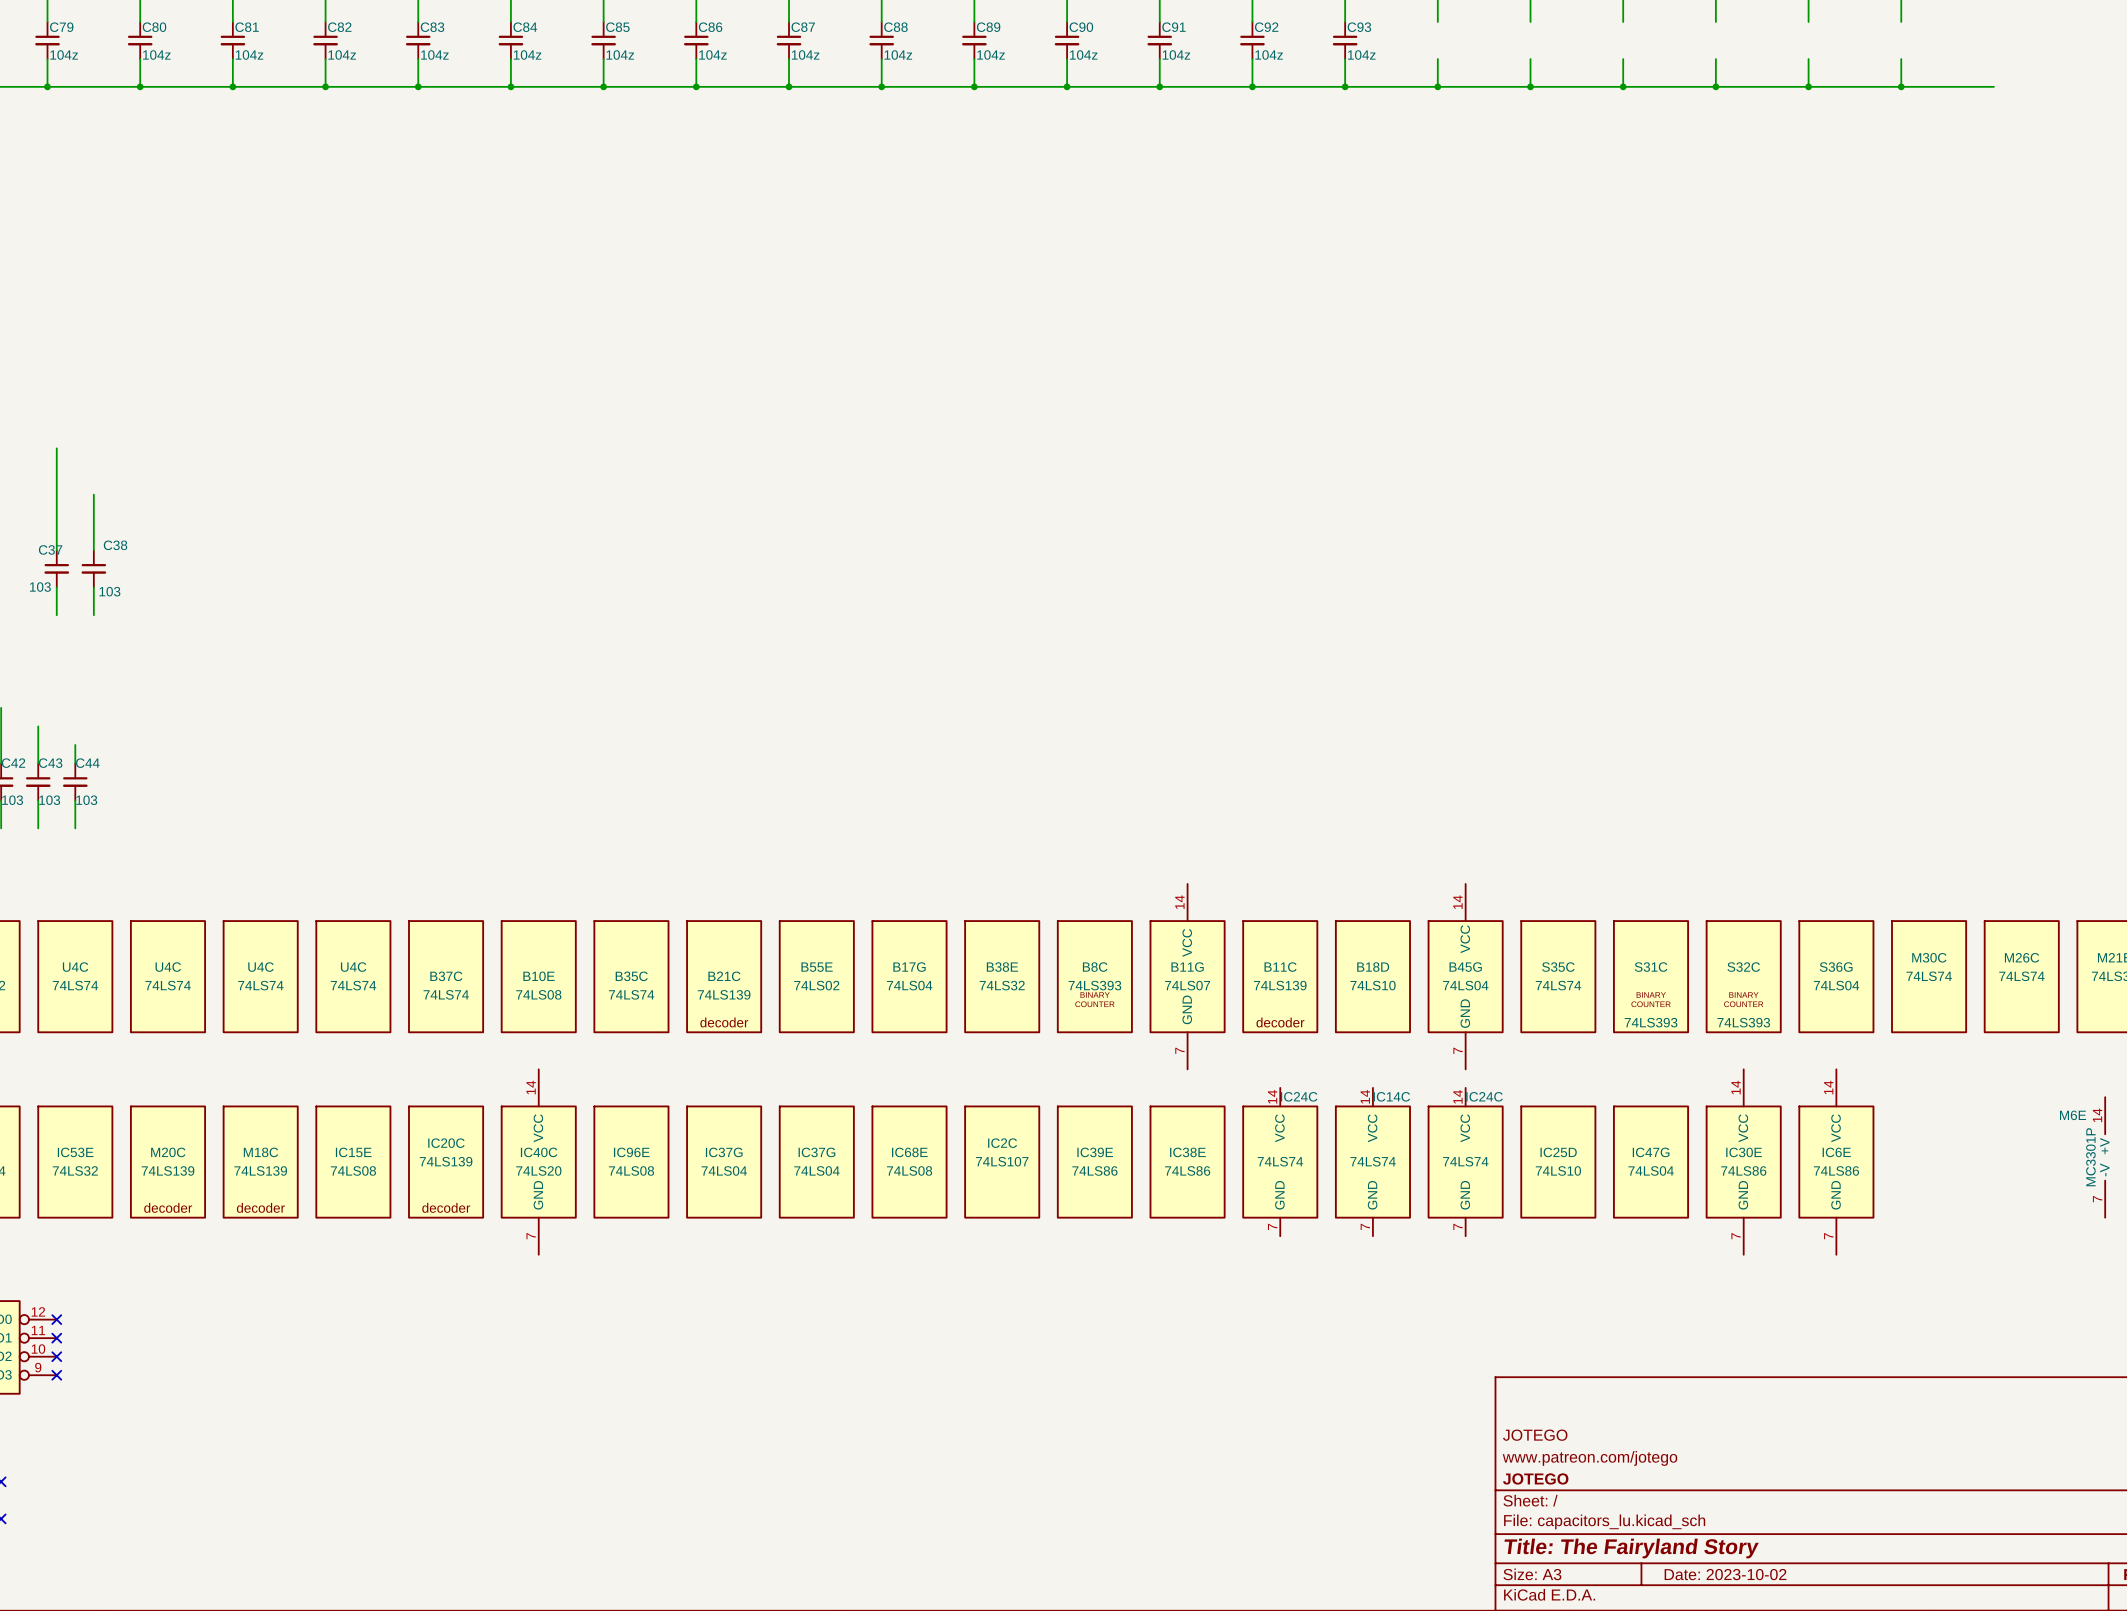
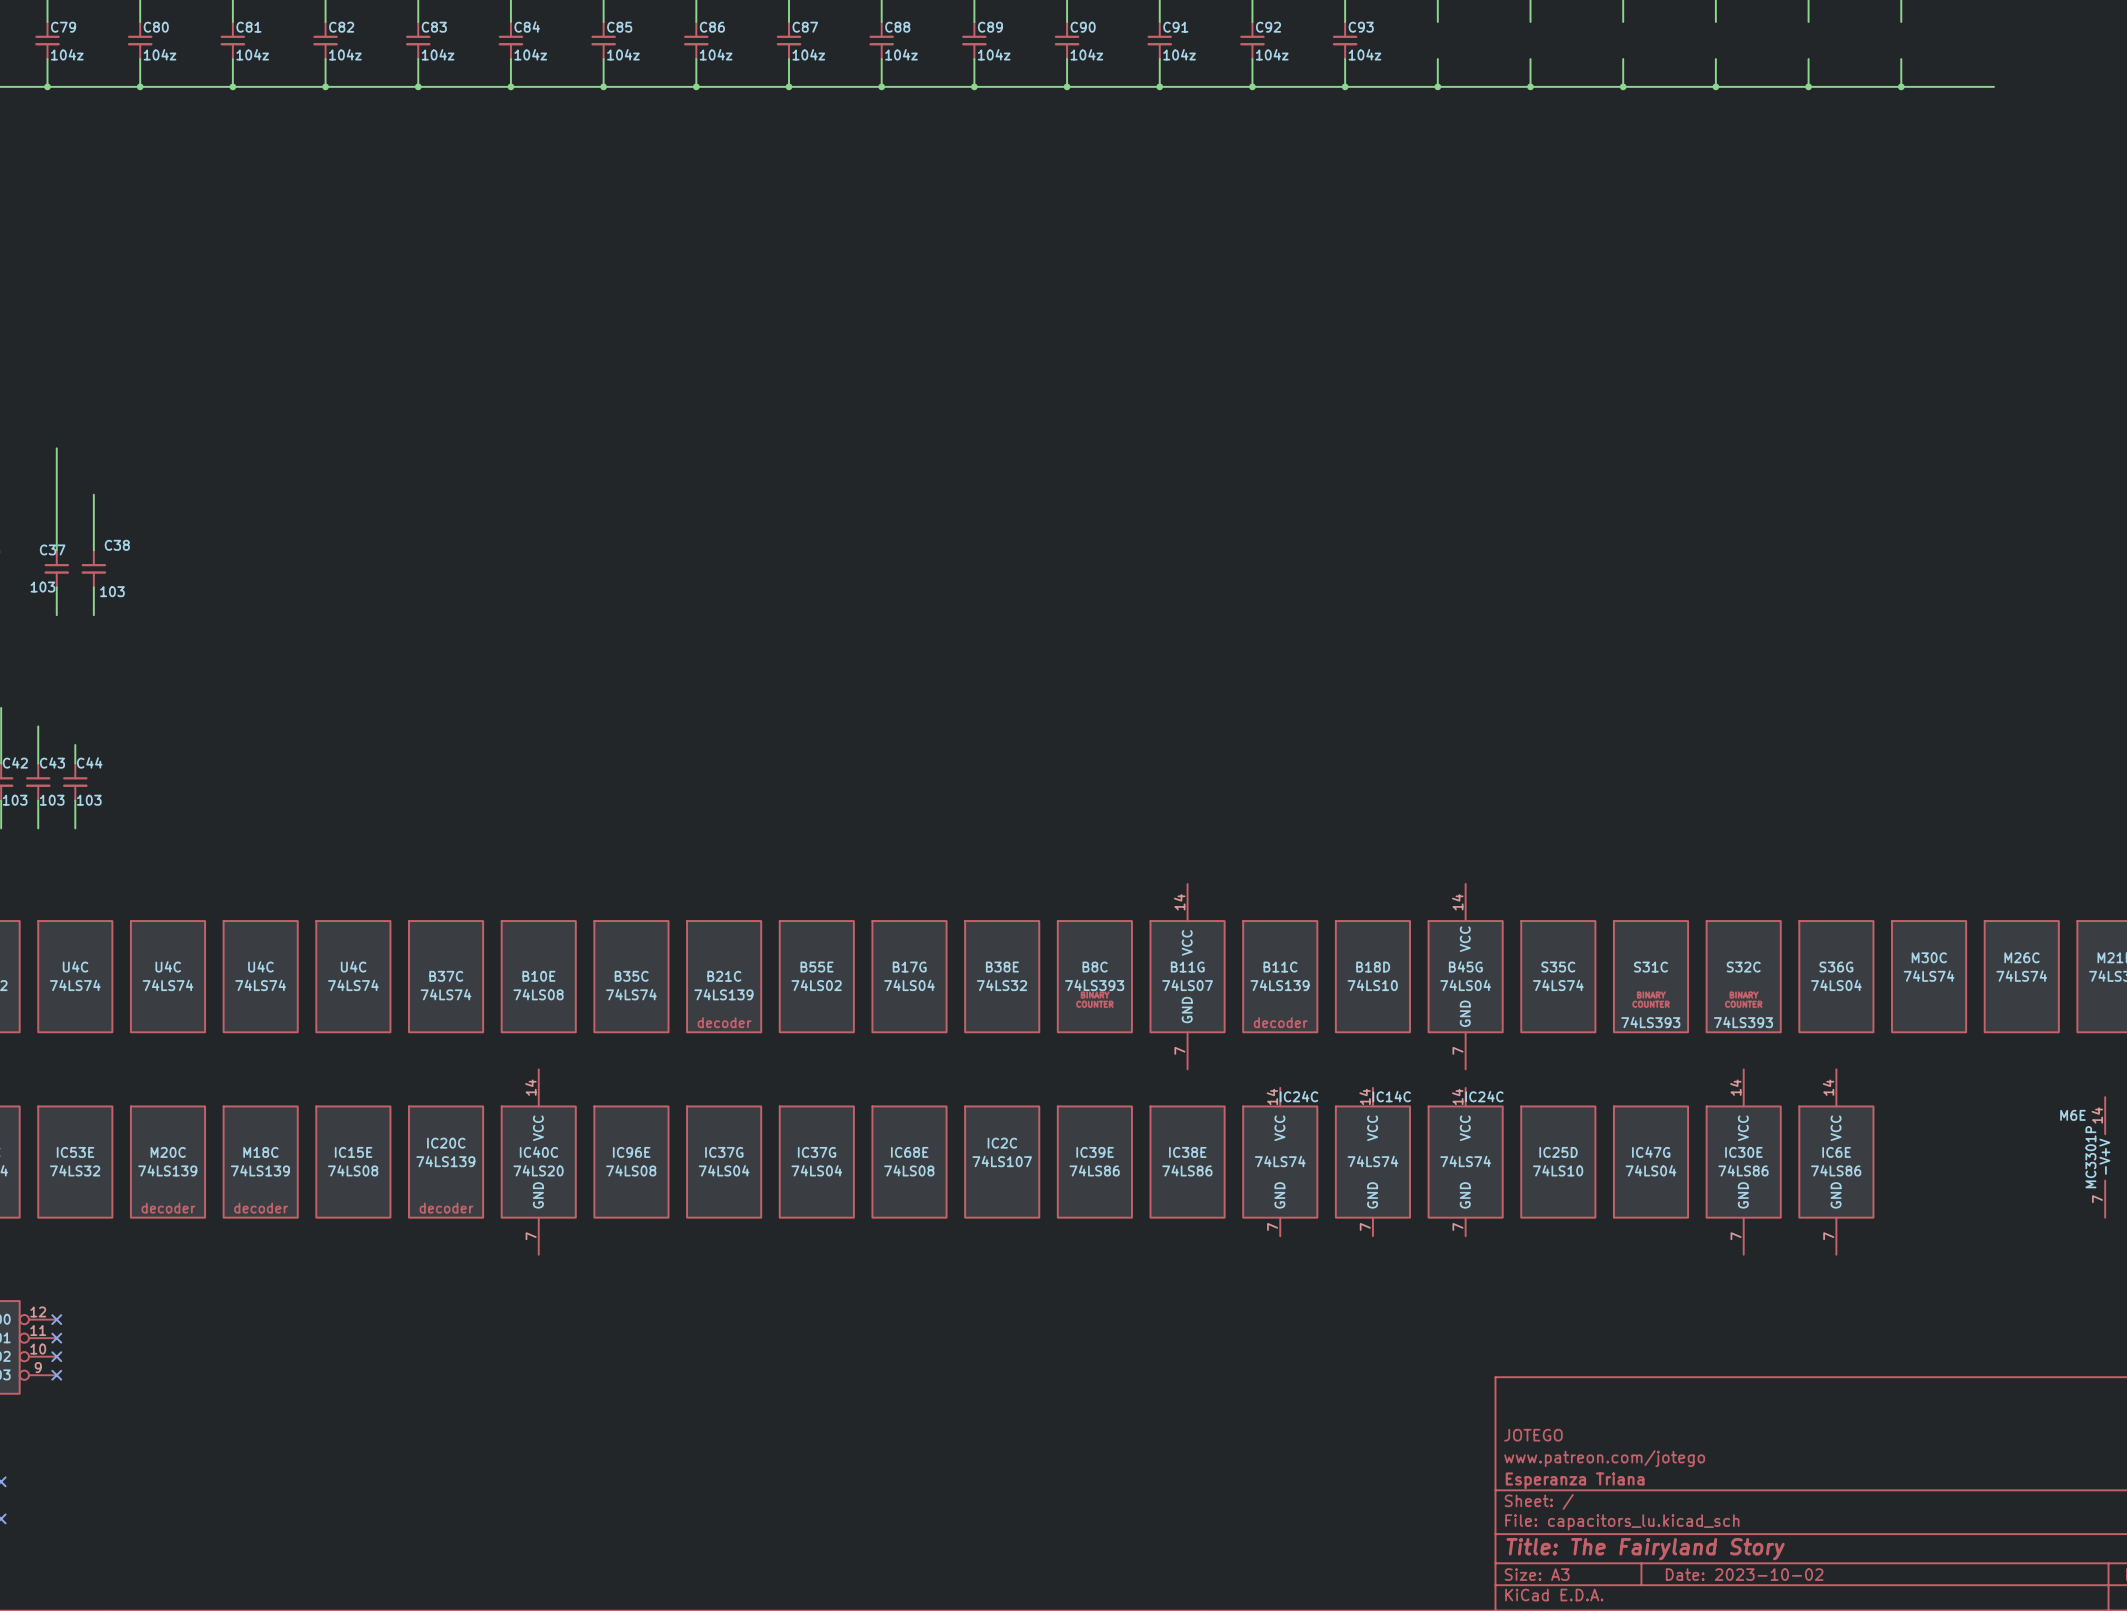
title block: JOTEGO (1535, 1478) -> Esperanza Triana (1575, 1480)

